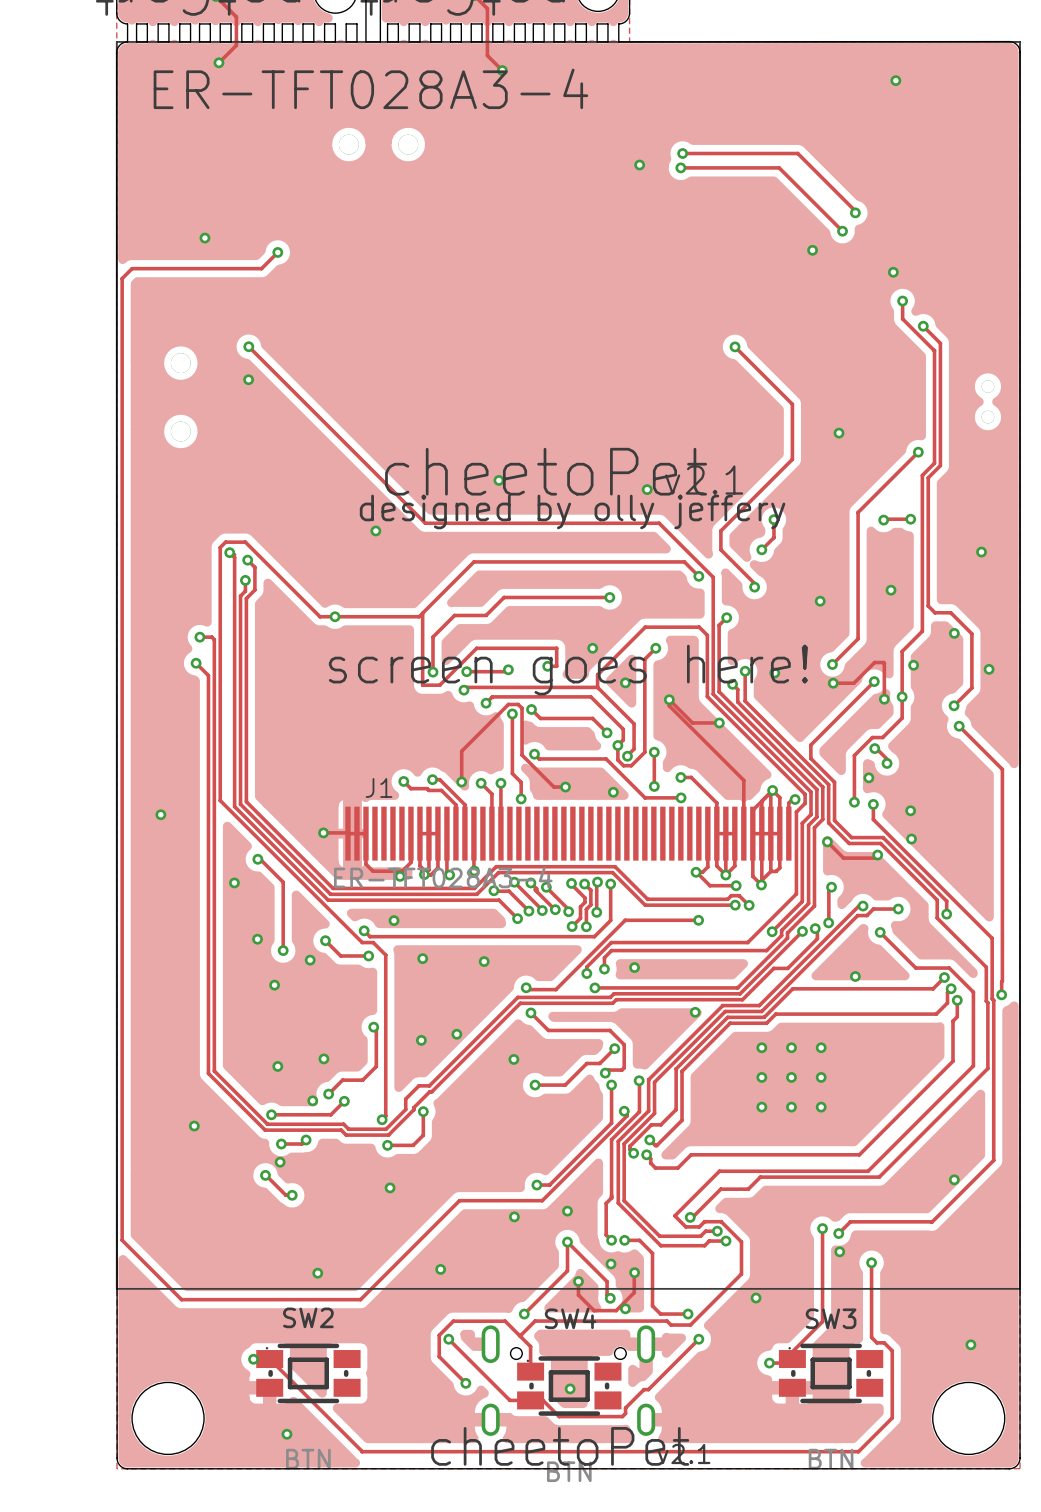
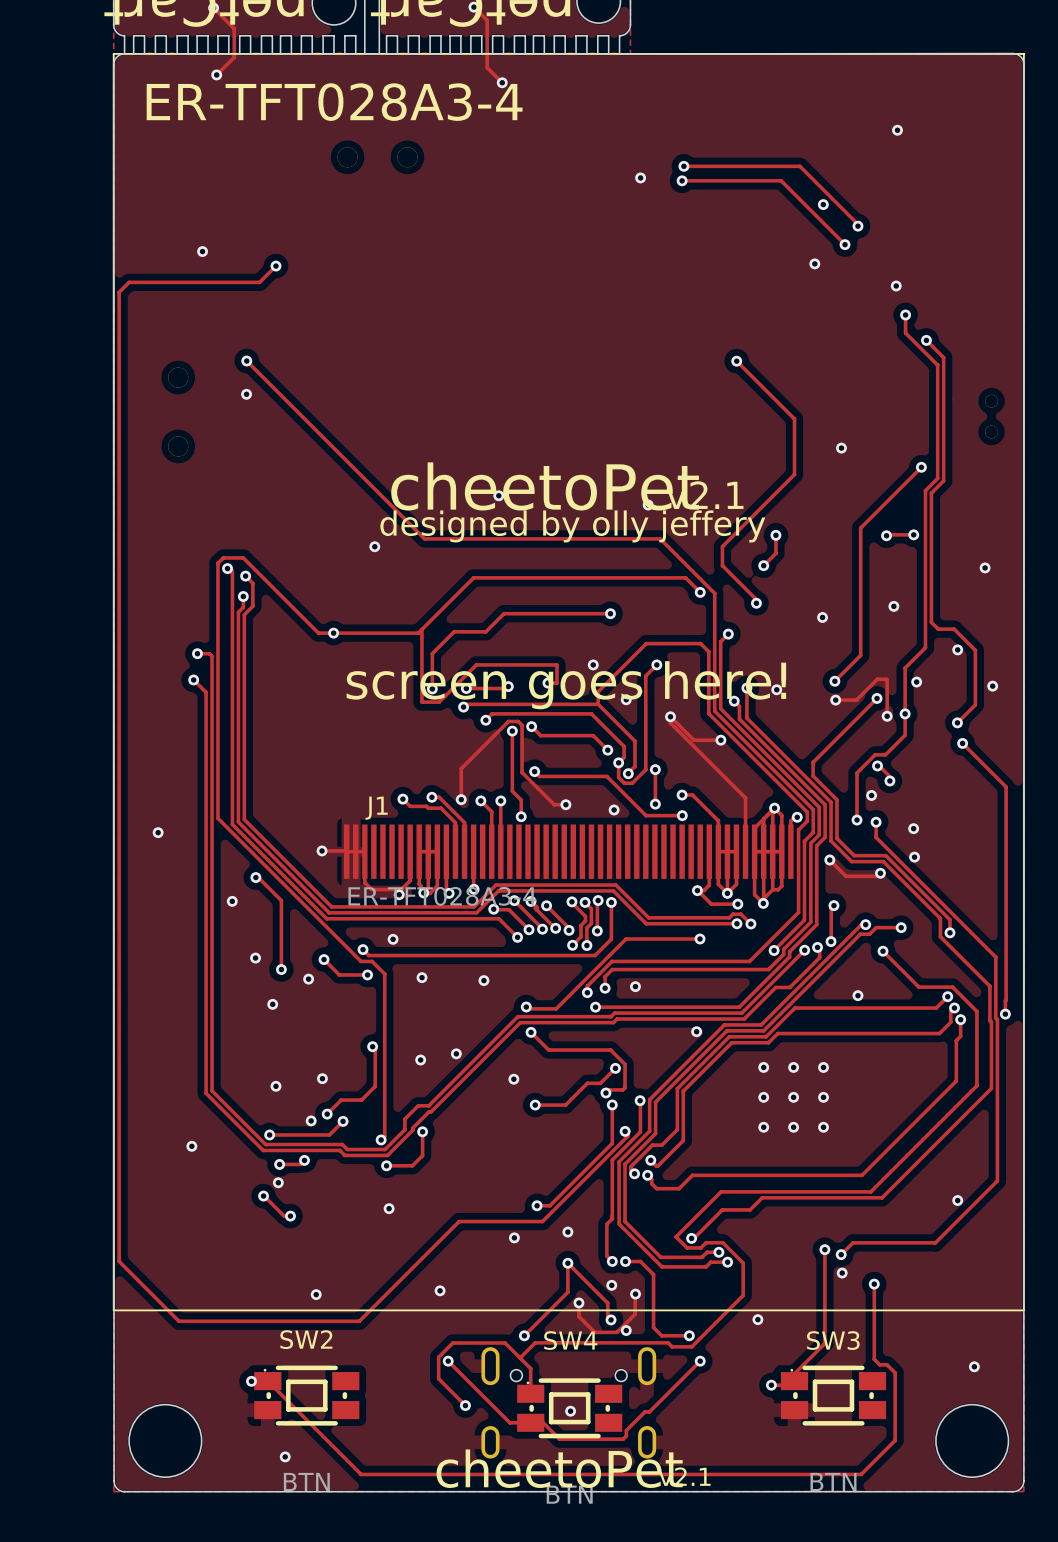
via position: (895, 80) -> (897, 130)
via: none -> (823, 204)

